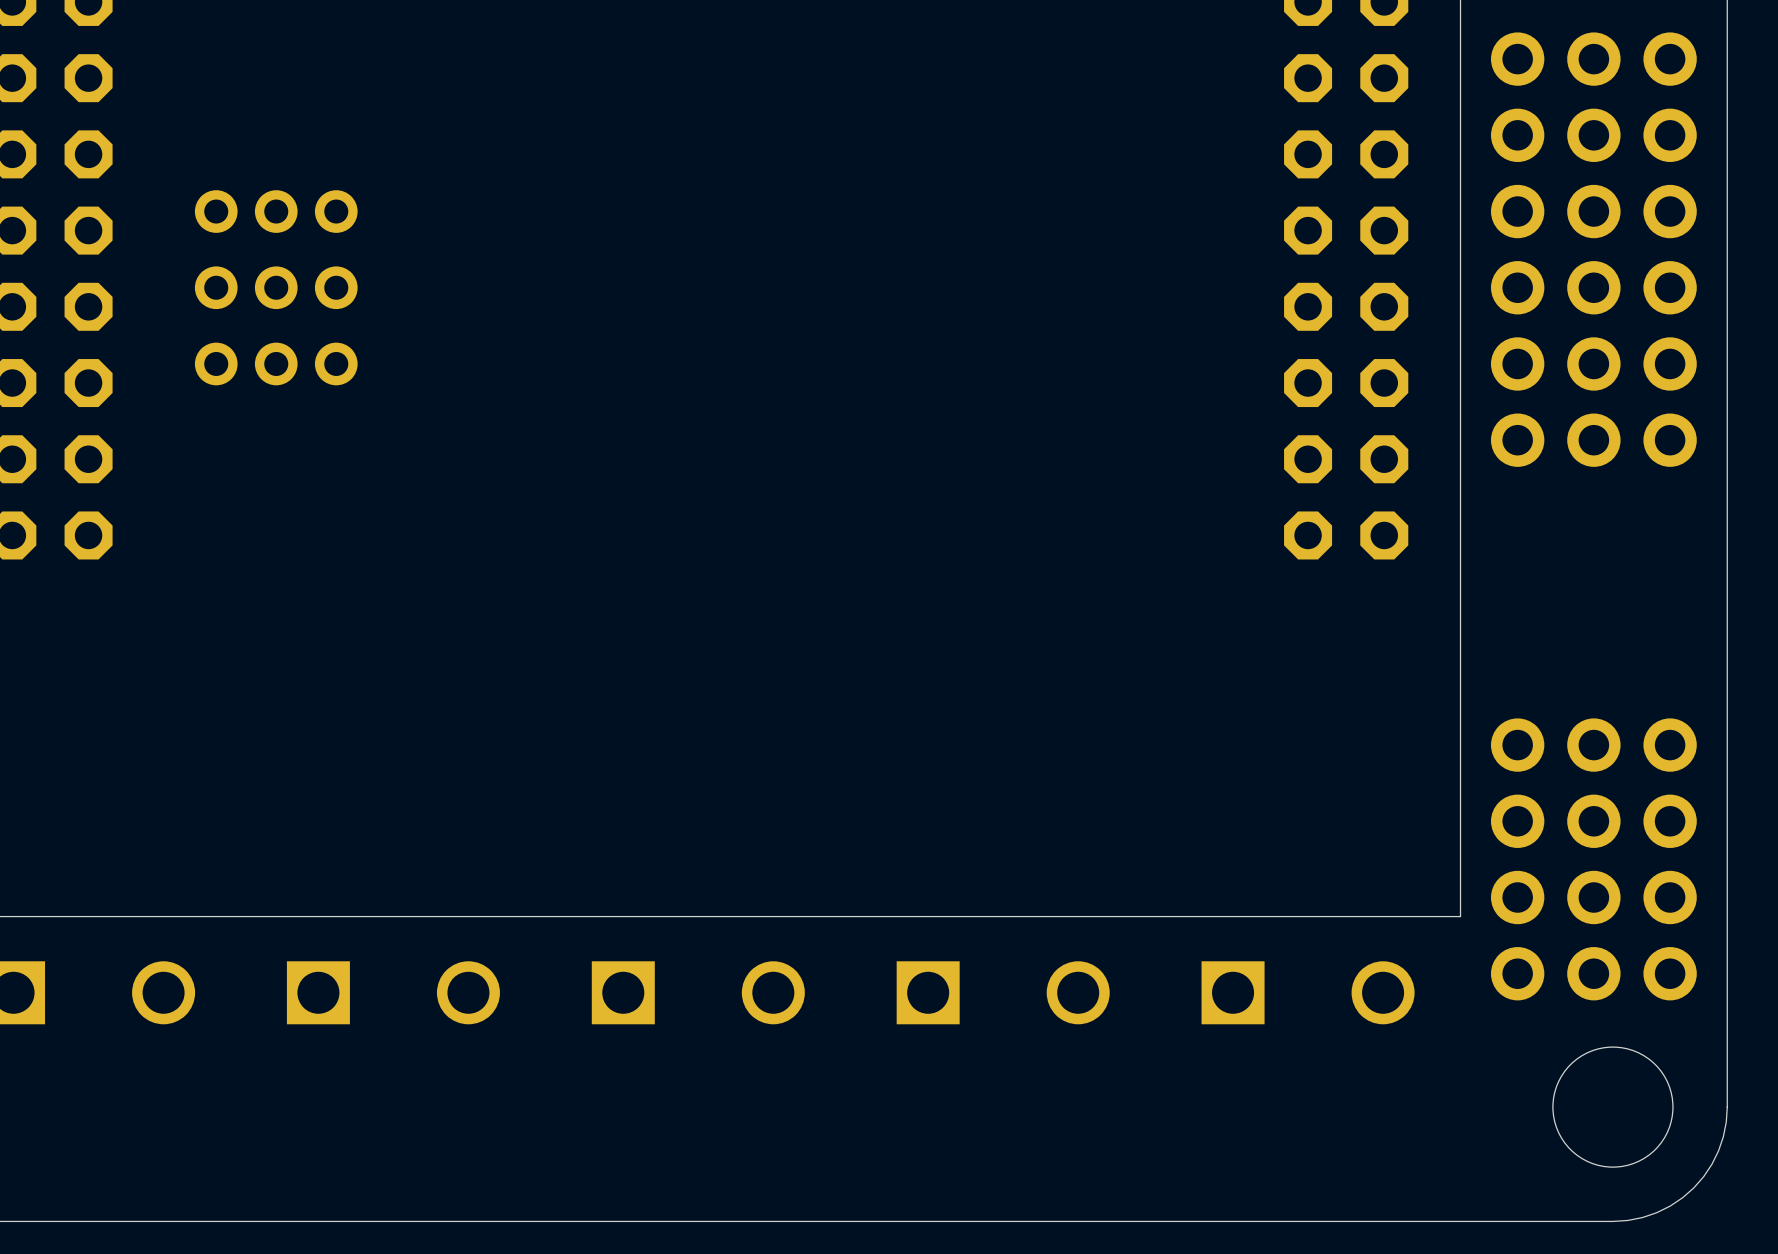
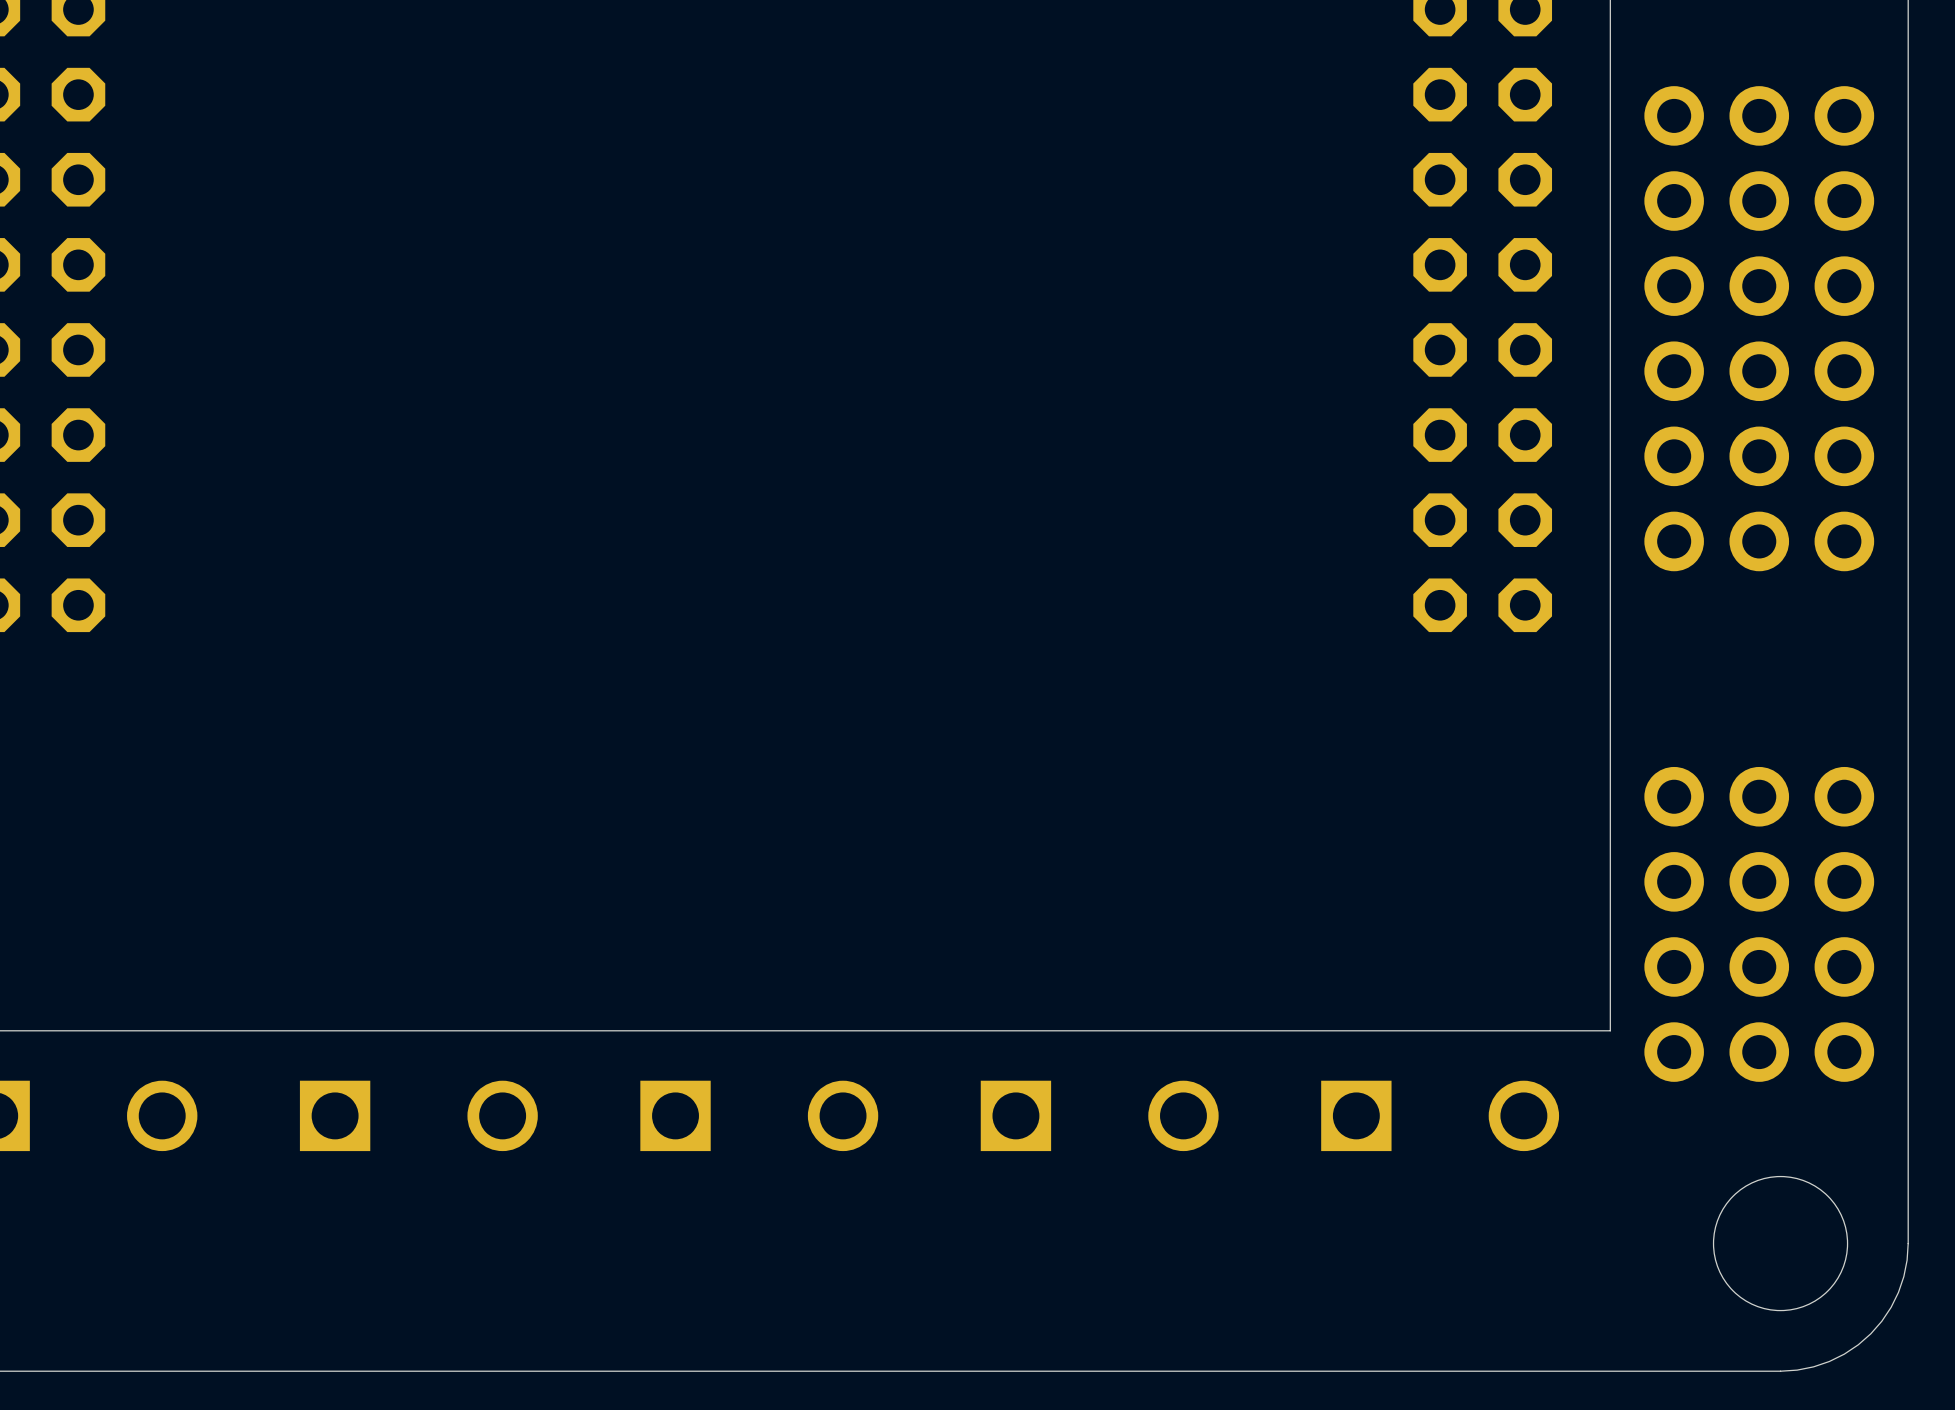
part: (276, 211) -> none
part position: (1517, 249) -> (1674, 328)
part position: (1593, 249) -> (1759, 328)
part position: (1670, 249) -> (1844, 328)
part: (276, 287) -> none
part: (276, 363) -> none
part position: (1593, 783) -> (1759, 839)
part position: (1593, 935) -> (1759, 1009)

